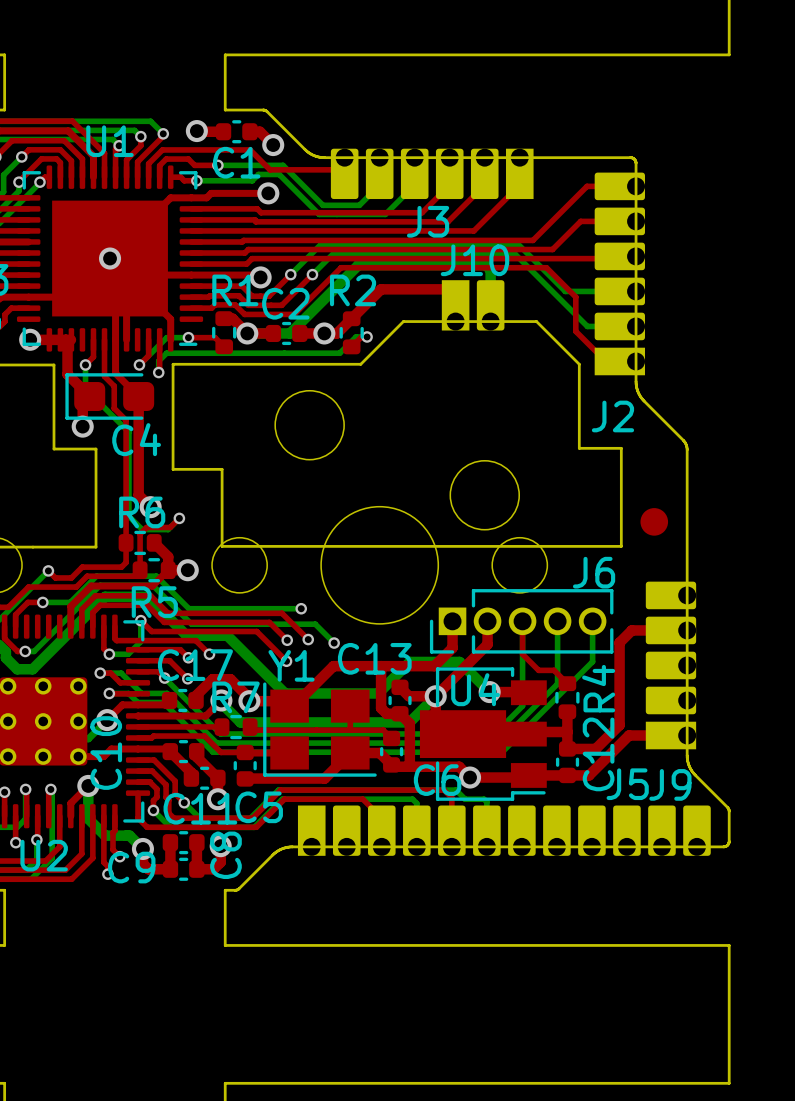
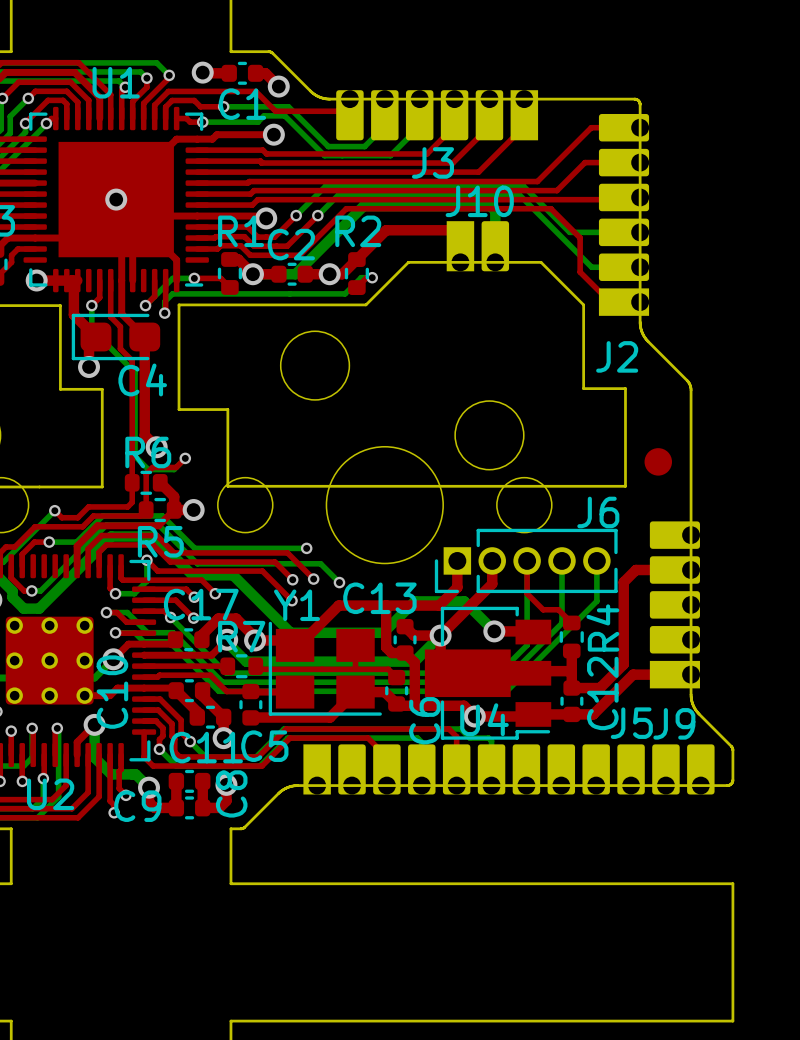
U4 name position: U4 (475, 689) -> U4 (484, 719)
C6 name rotation: 0° (437, 780) -> 90° counterclockwise (424, 720)

